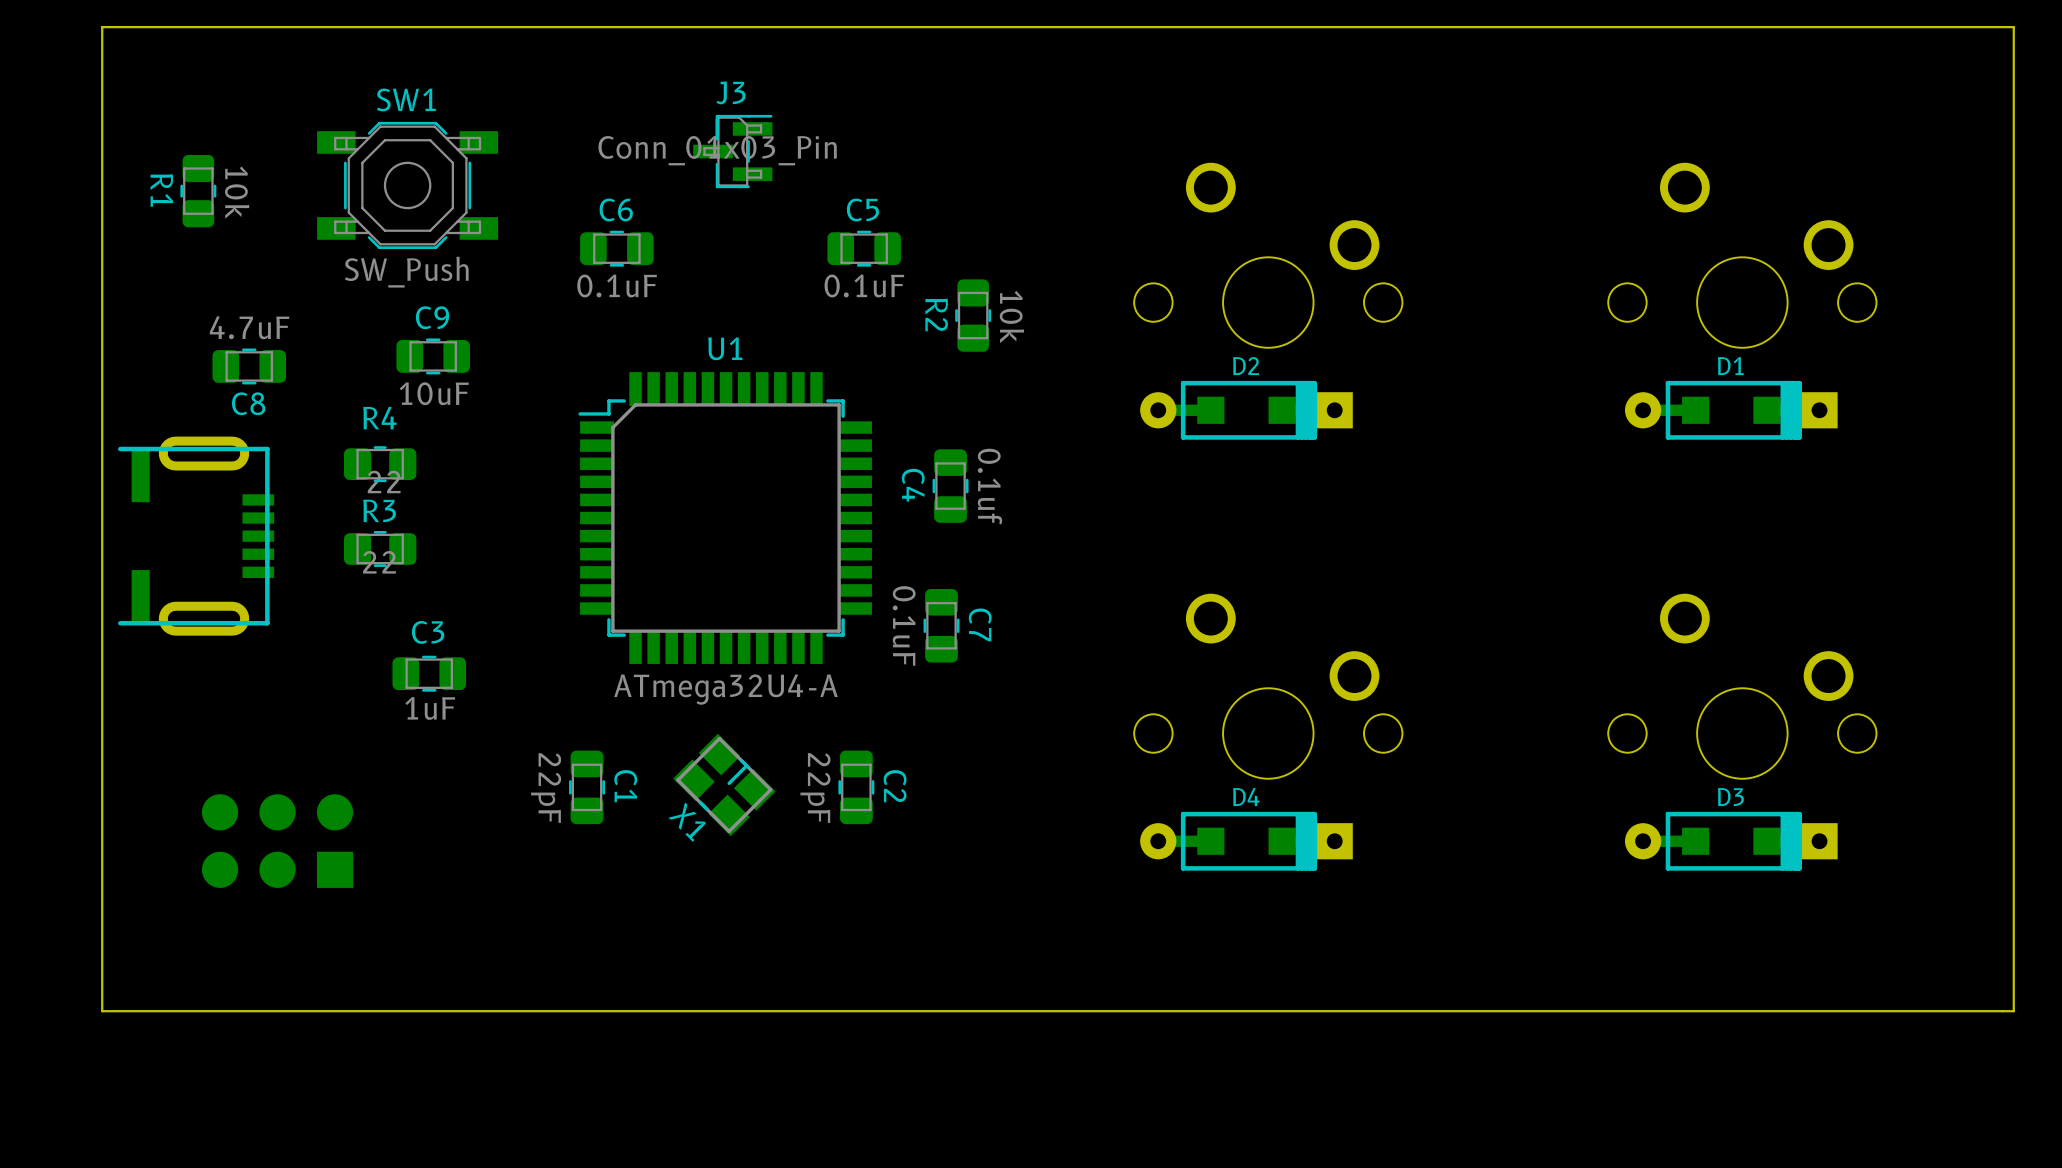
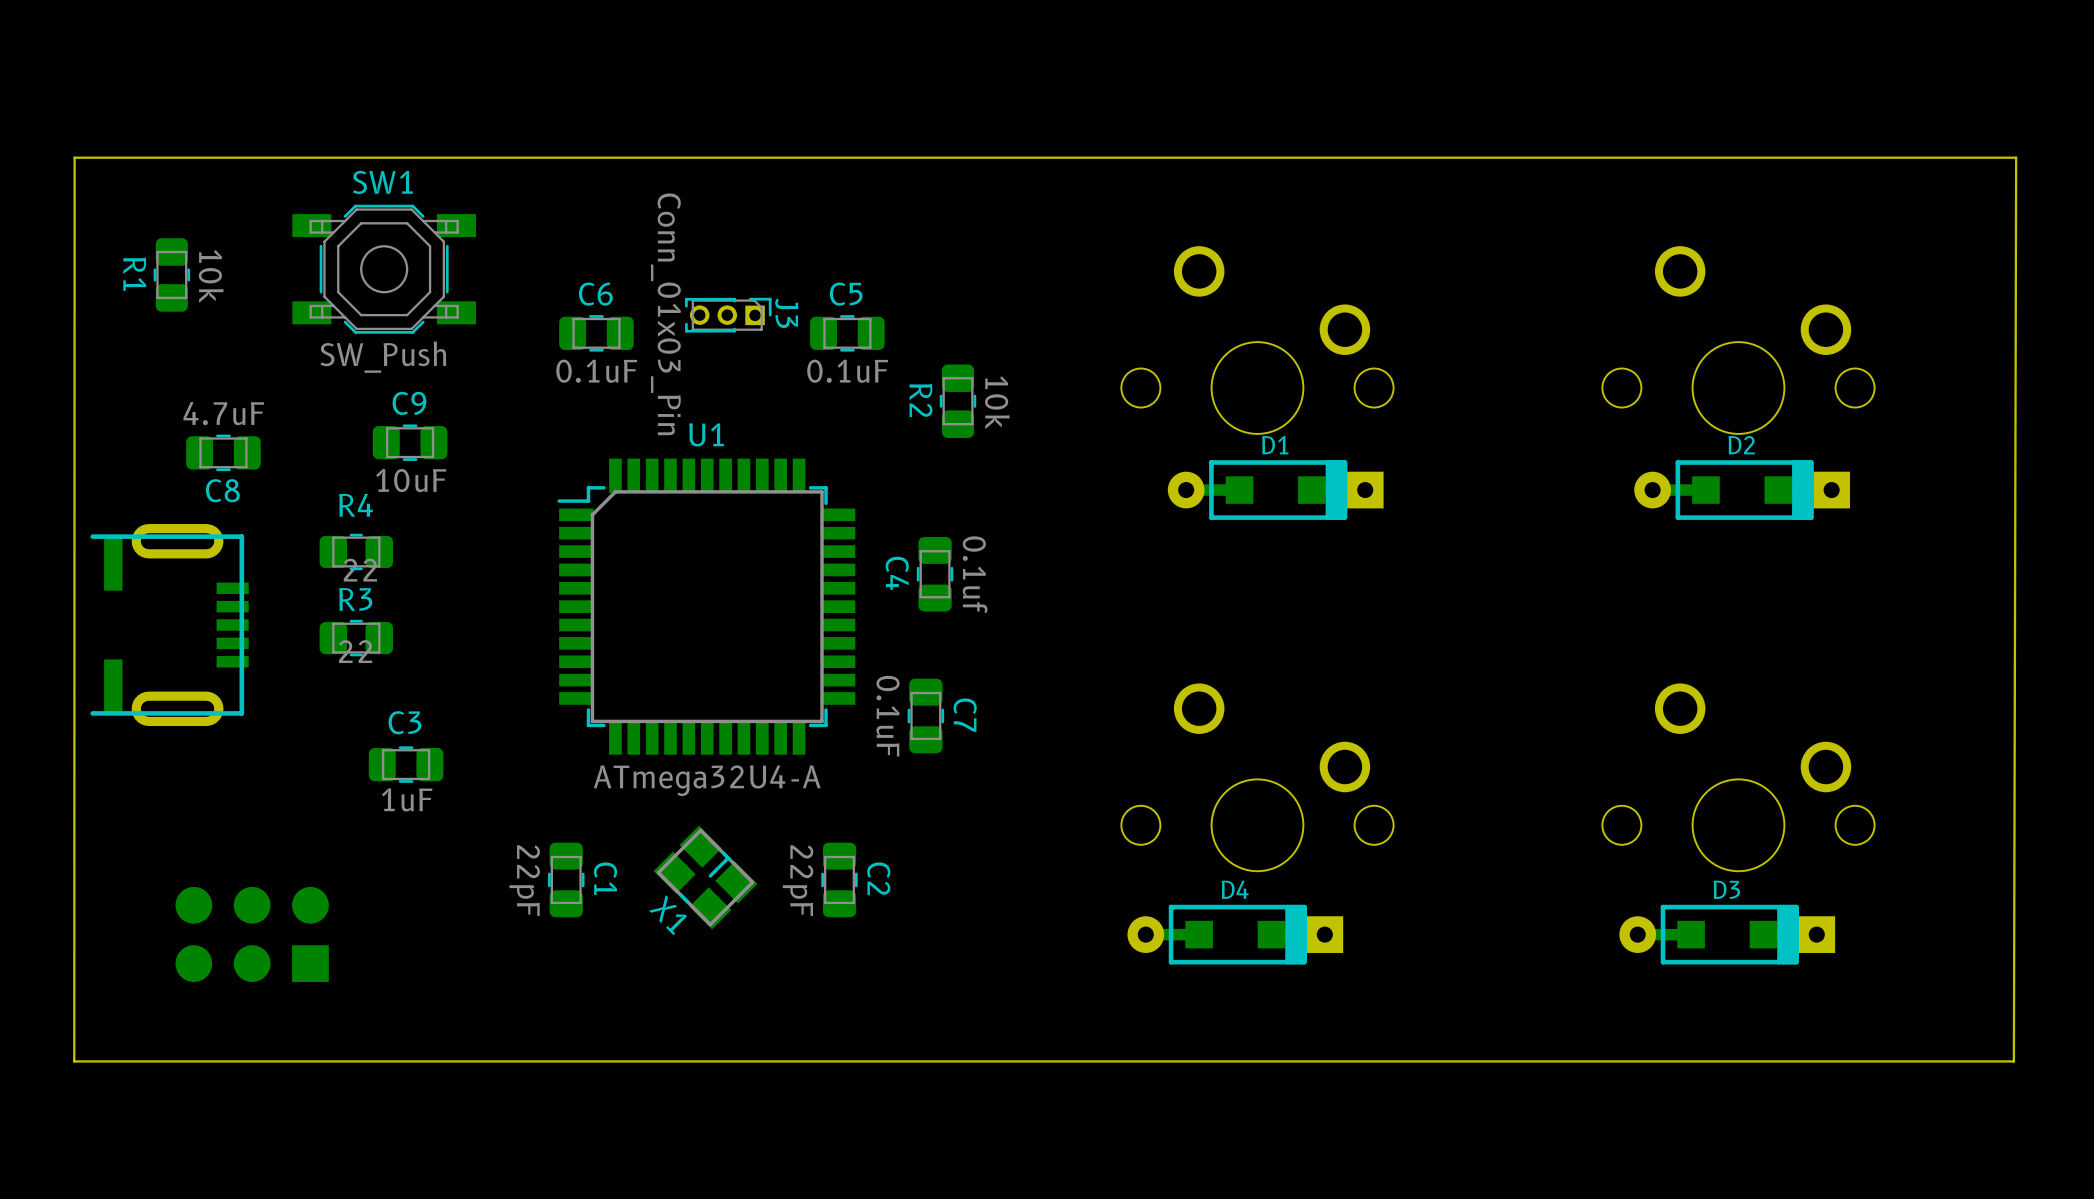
board edge: (2013, 27) (2013, 1011) (102, 1011) (102, 27) (2013, 27) -> (2016, 157) (2013, 1061) (74, 1061) (74, 157) (2016, 157)
J3 name position: J3 (731, 92) -> J3 (786, 313)
J3 footprint: [693, 114, 773, 189] -> [685, 297, 772, 333]
D2 position: (1246, 410) -> (1742, 490)
D1 position: (1731, 410) -> (1275, 490)

